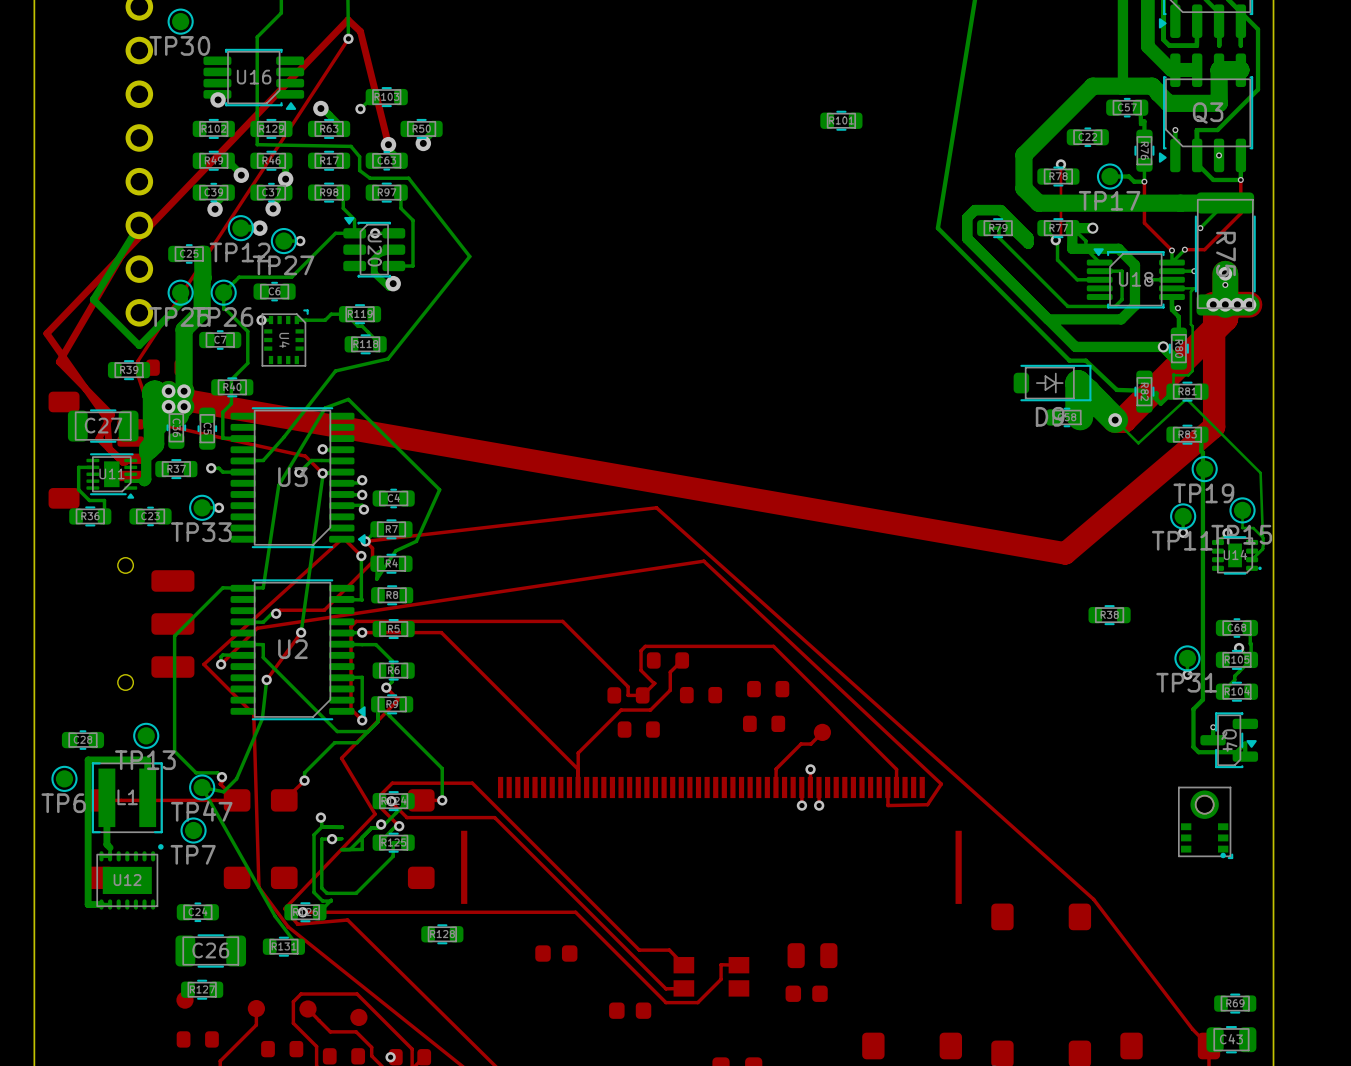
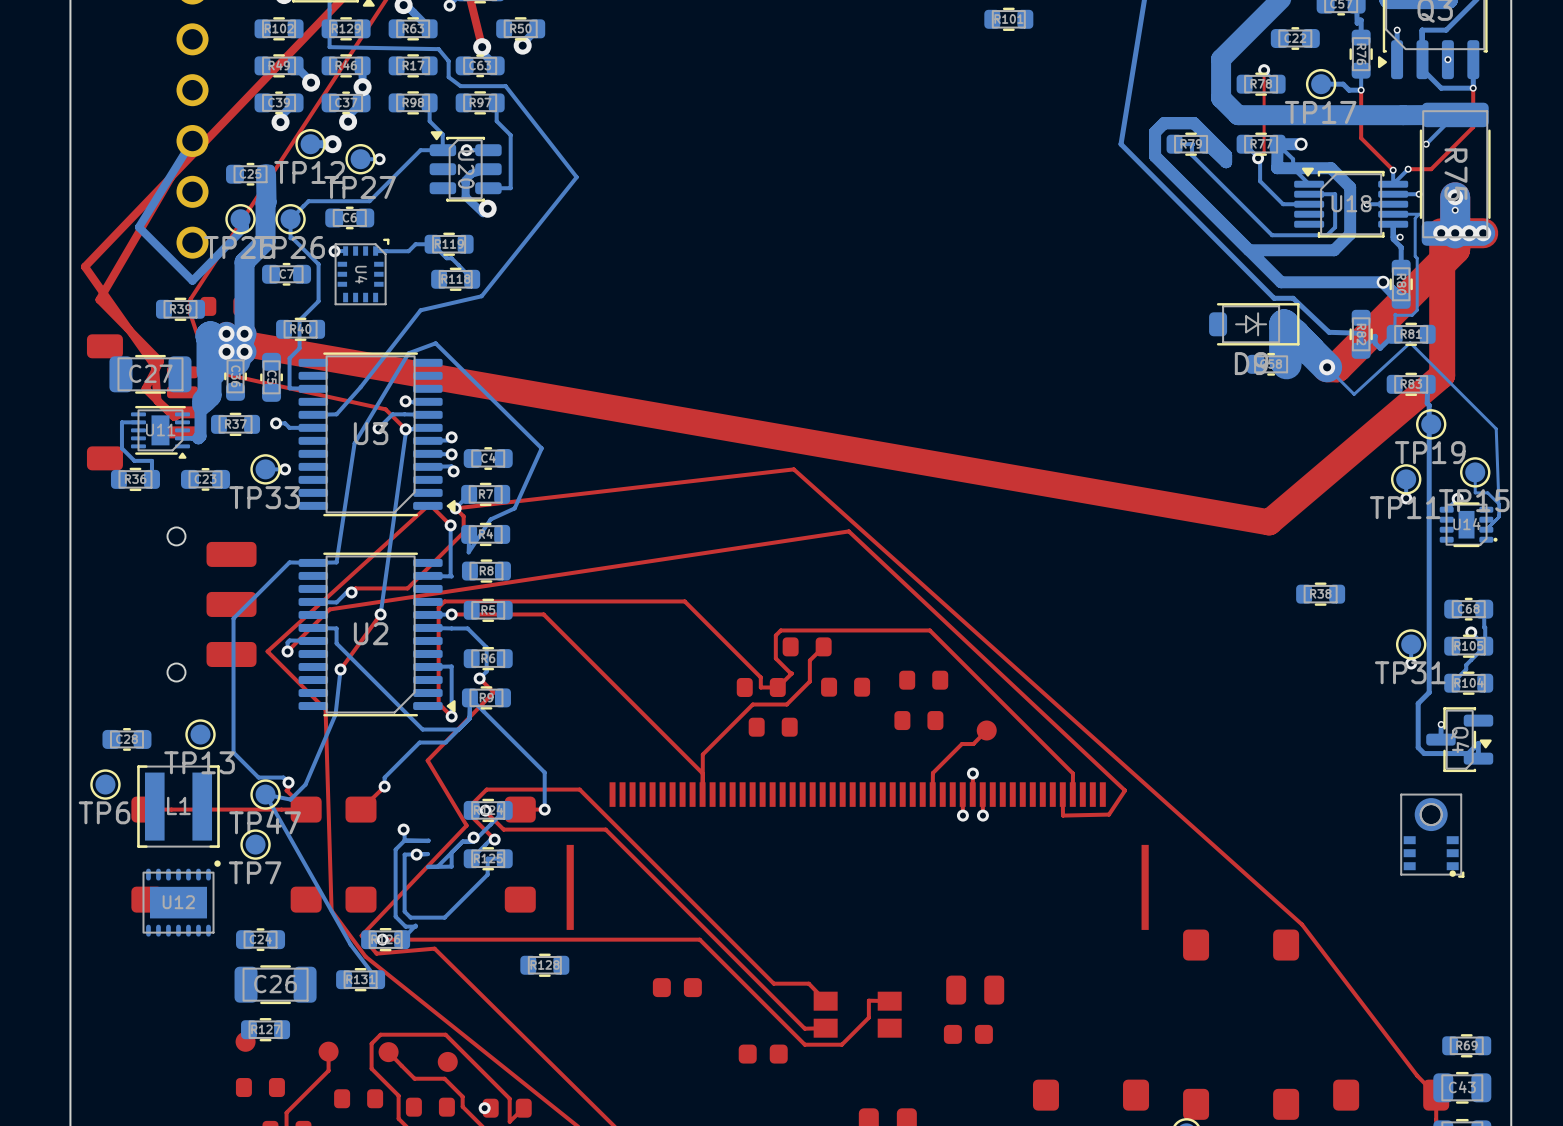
bottom track: (106, 797) (106, 844) (110, 847) (110, 856) (101, 856) -> none
bottom track: (147, 797) (147, 759) (88, 759) (88, 904) (110, 904) -> none

